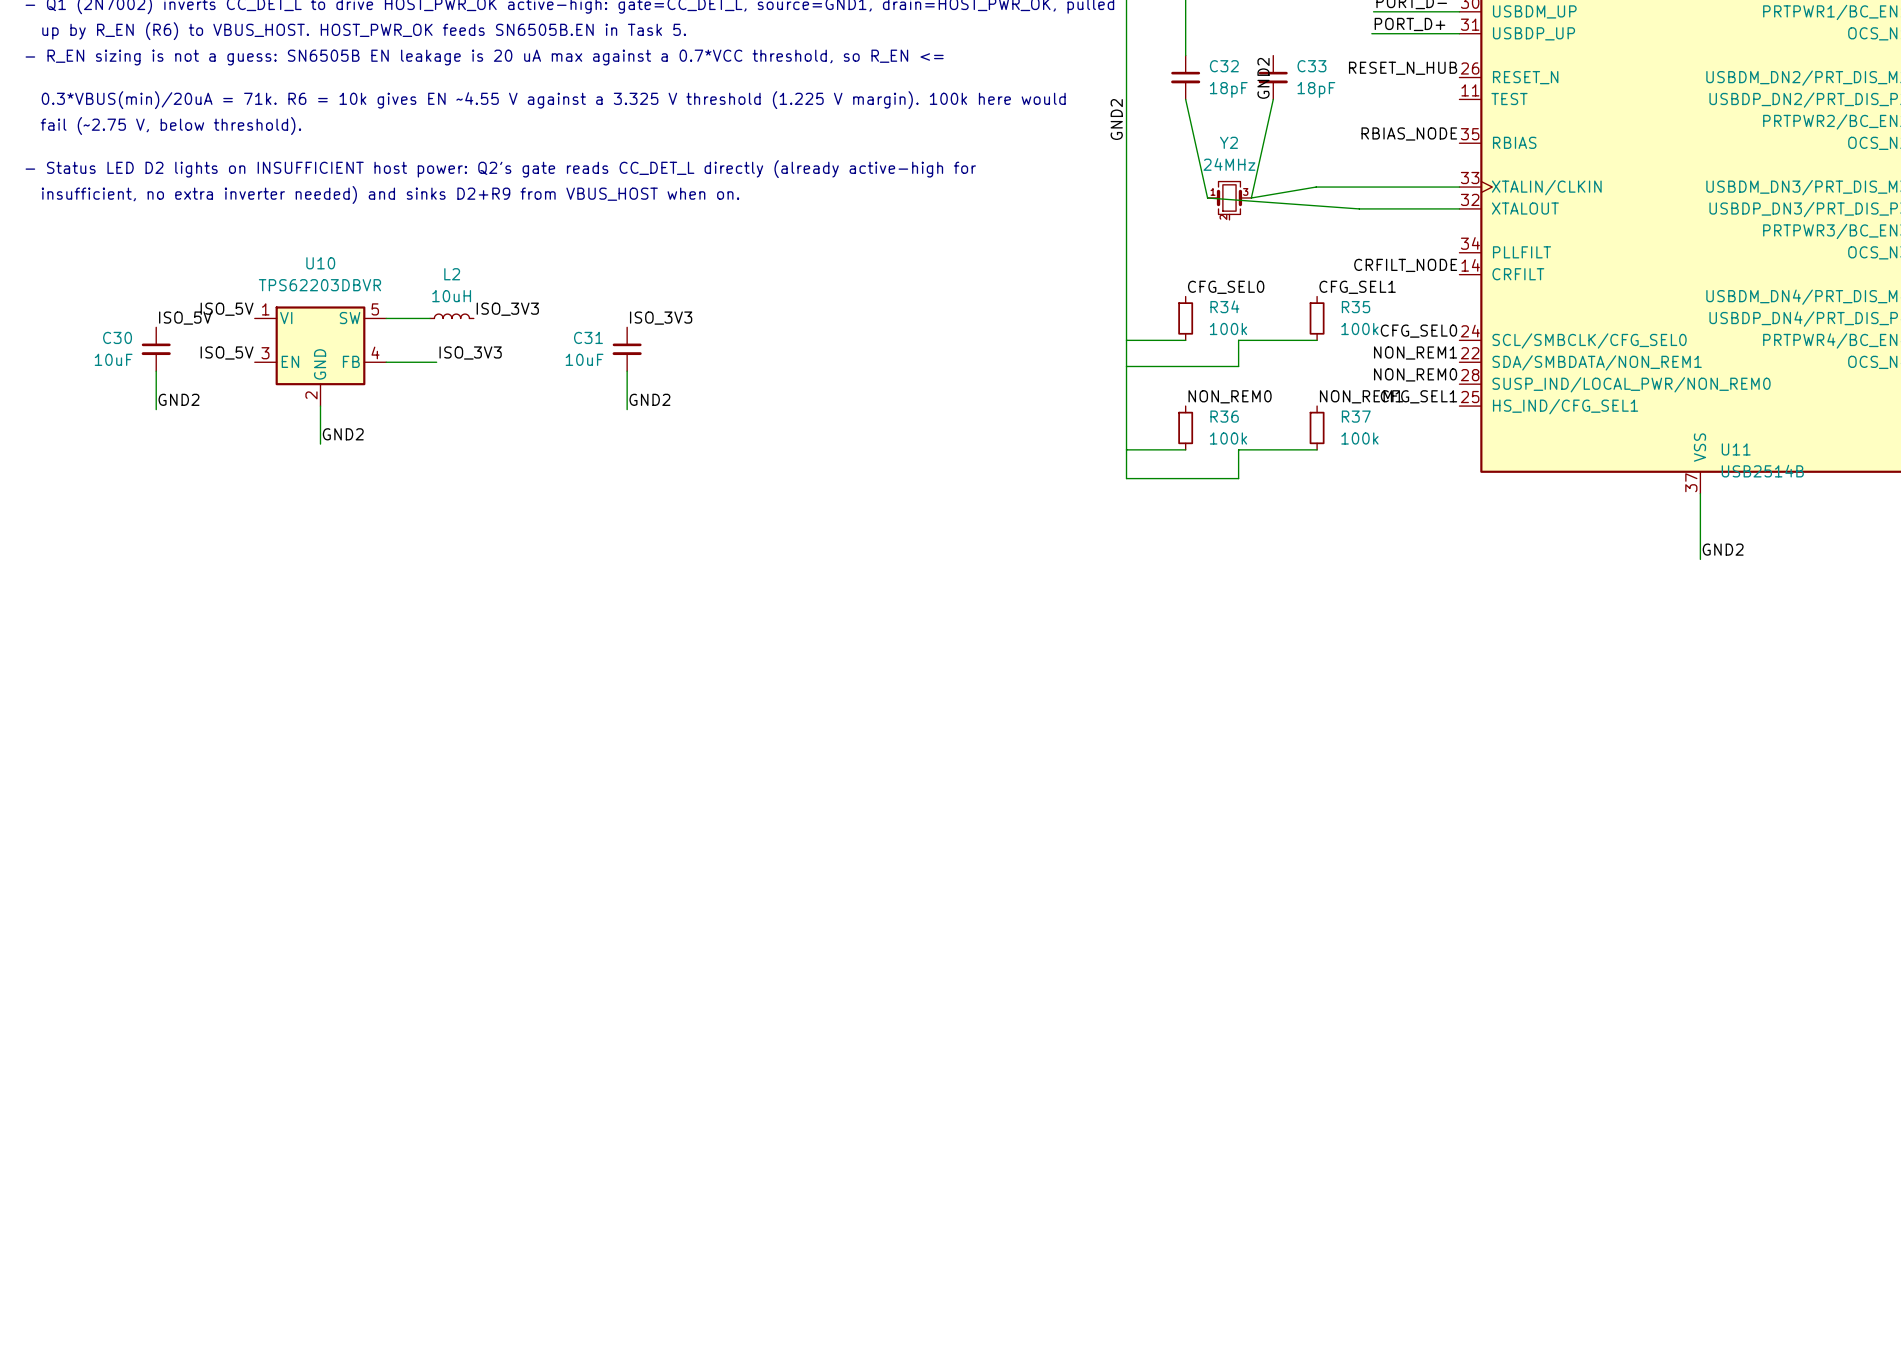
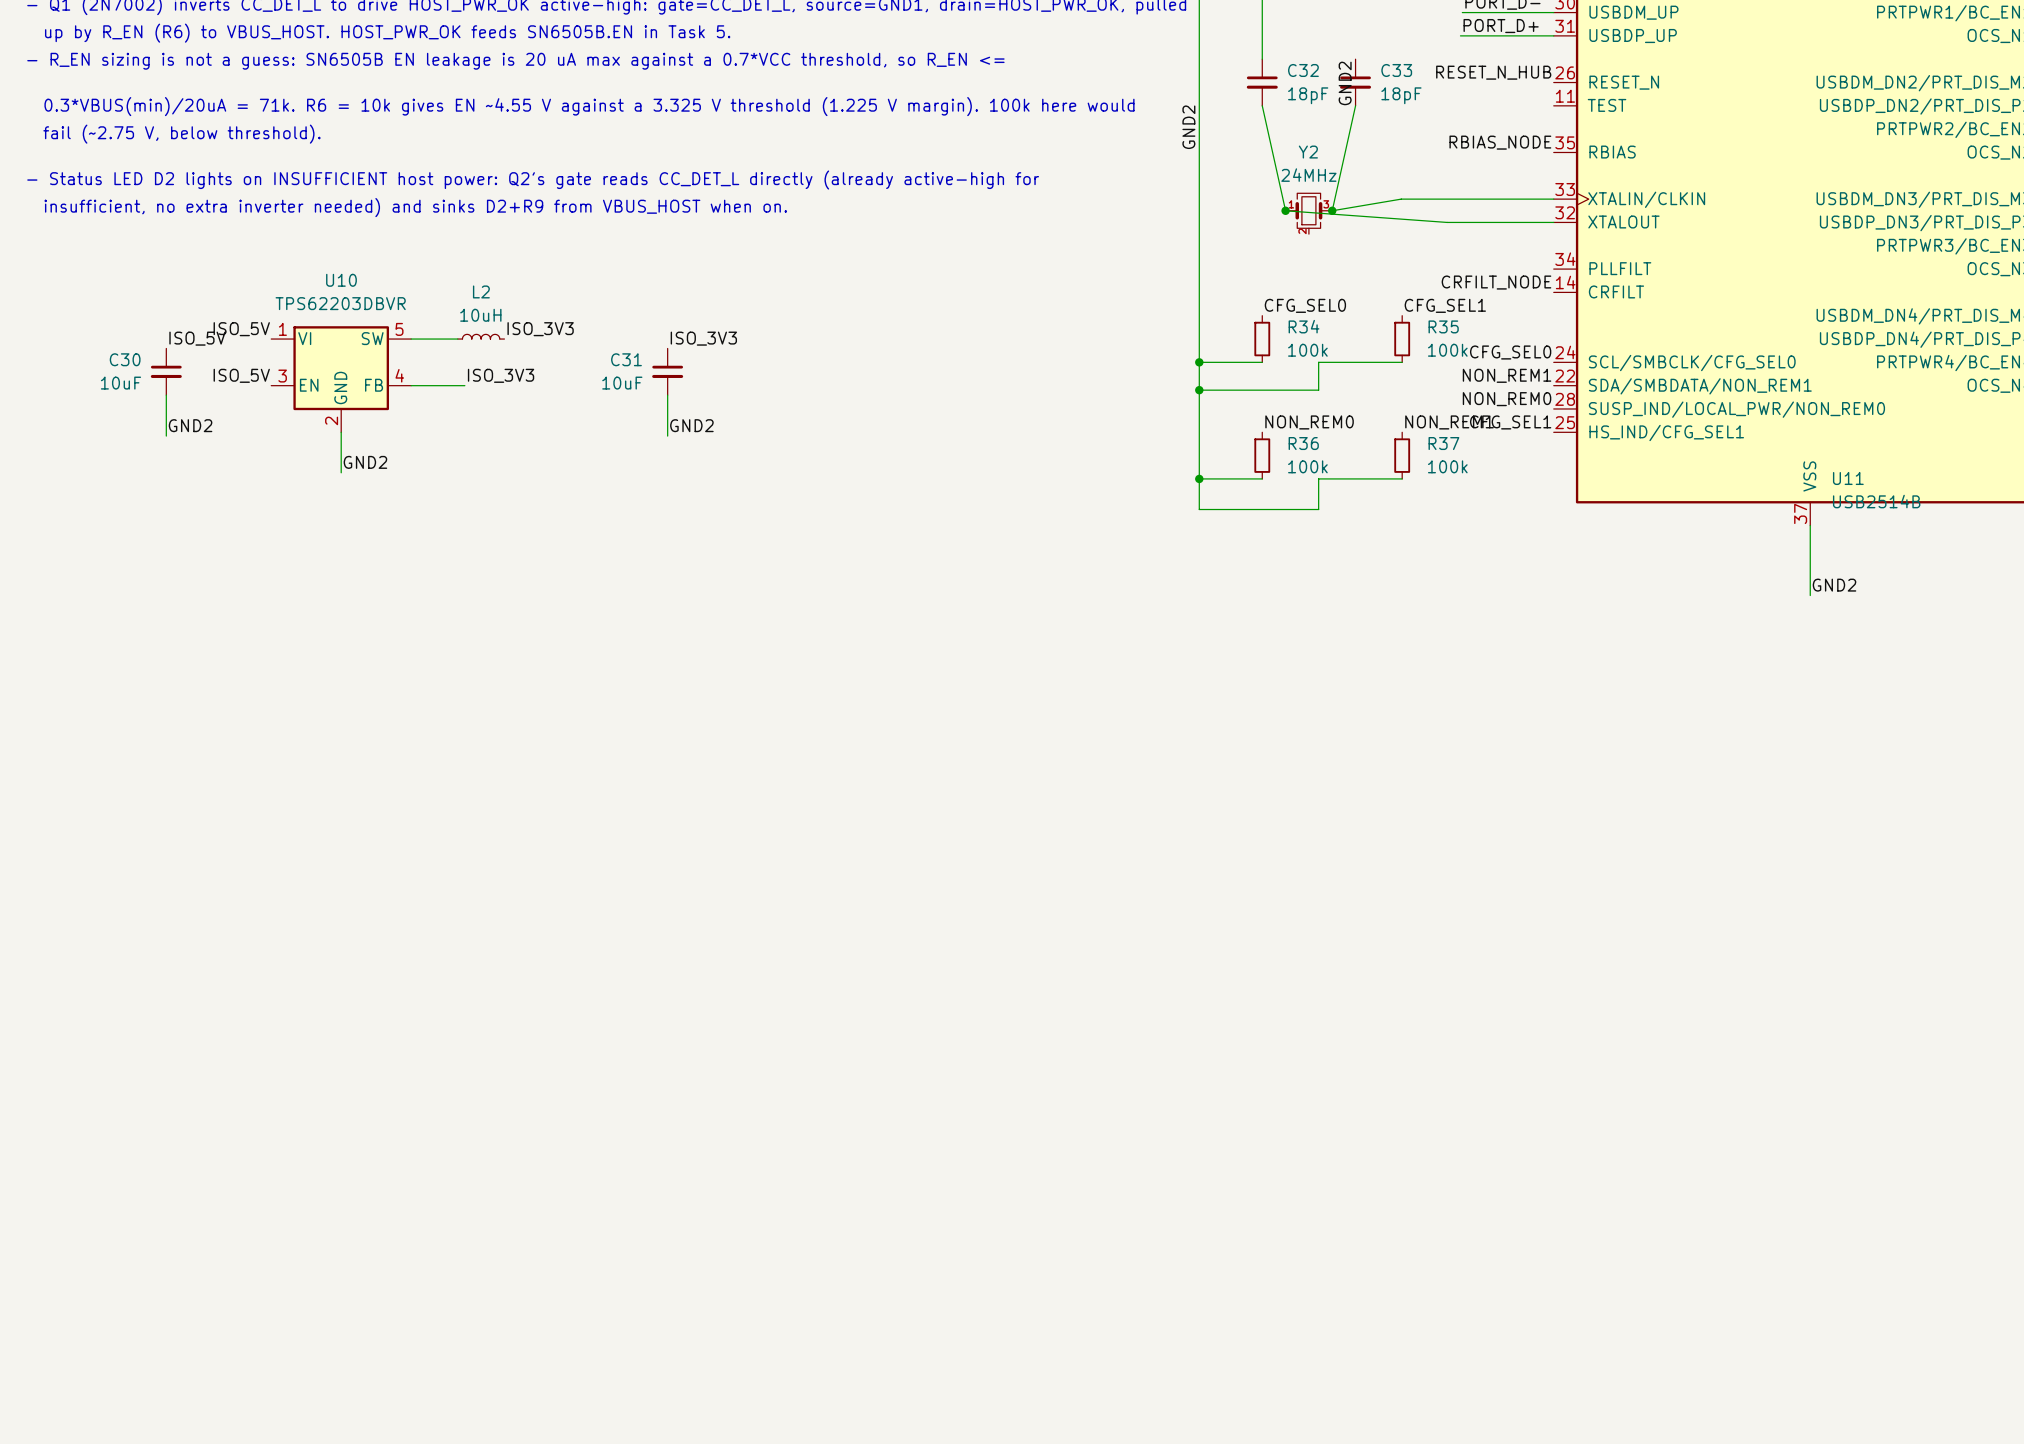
junction: none -> (1285, 210)
junction: none -> (1332, 210)
junction: none -> (1199, 362)
junction: none -> (1199, 390)
junction: none -> (1199, 478)

